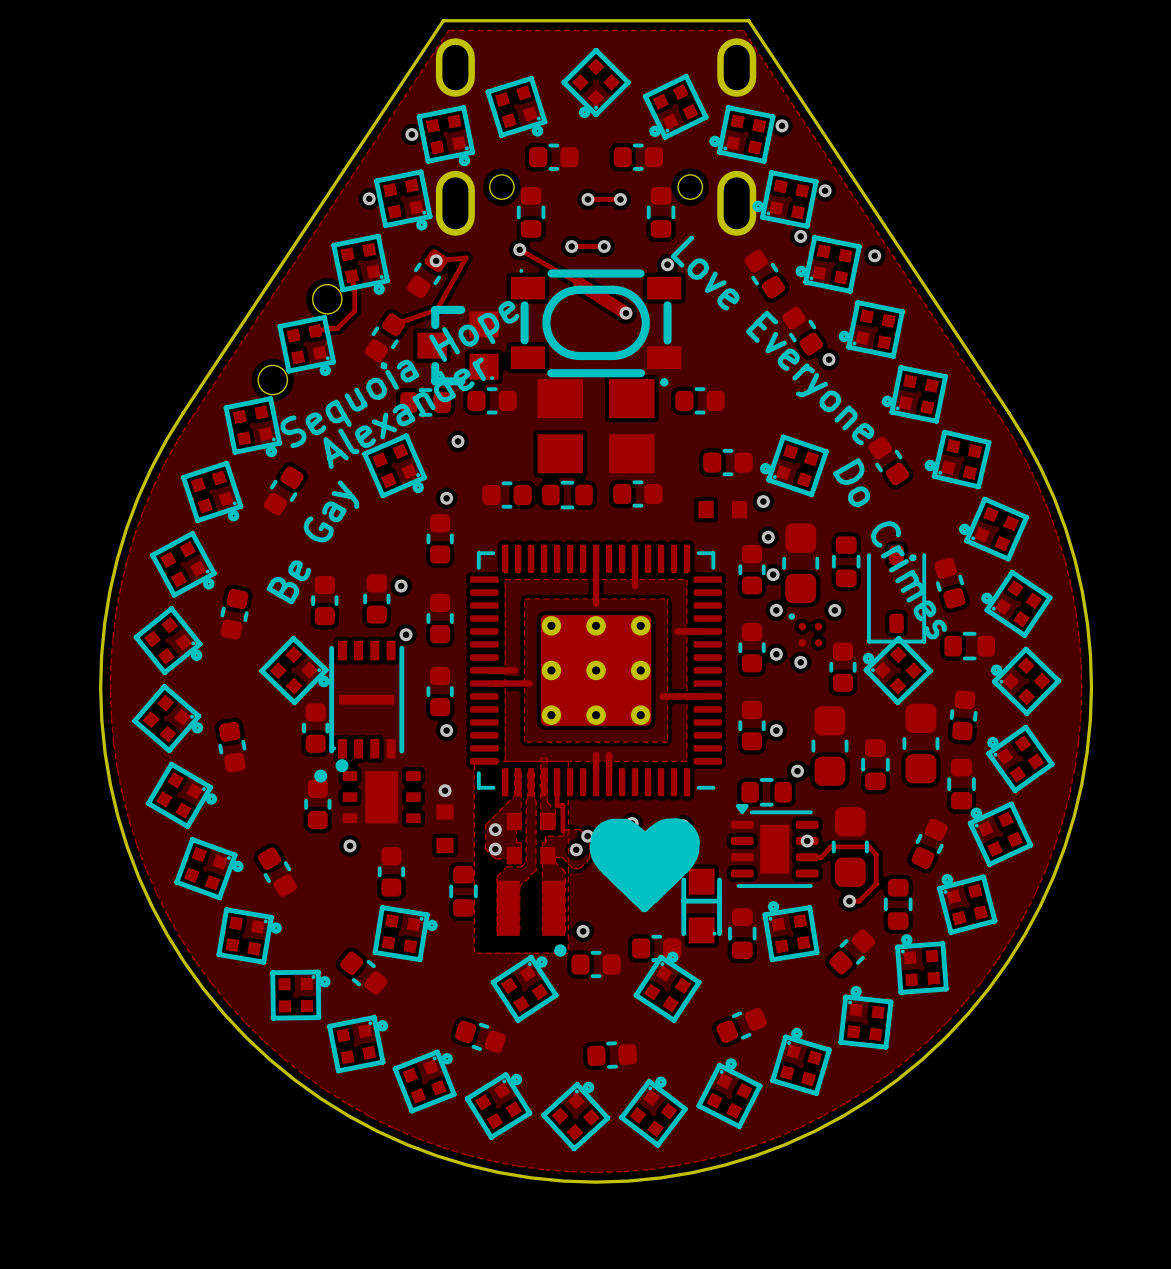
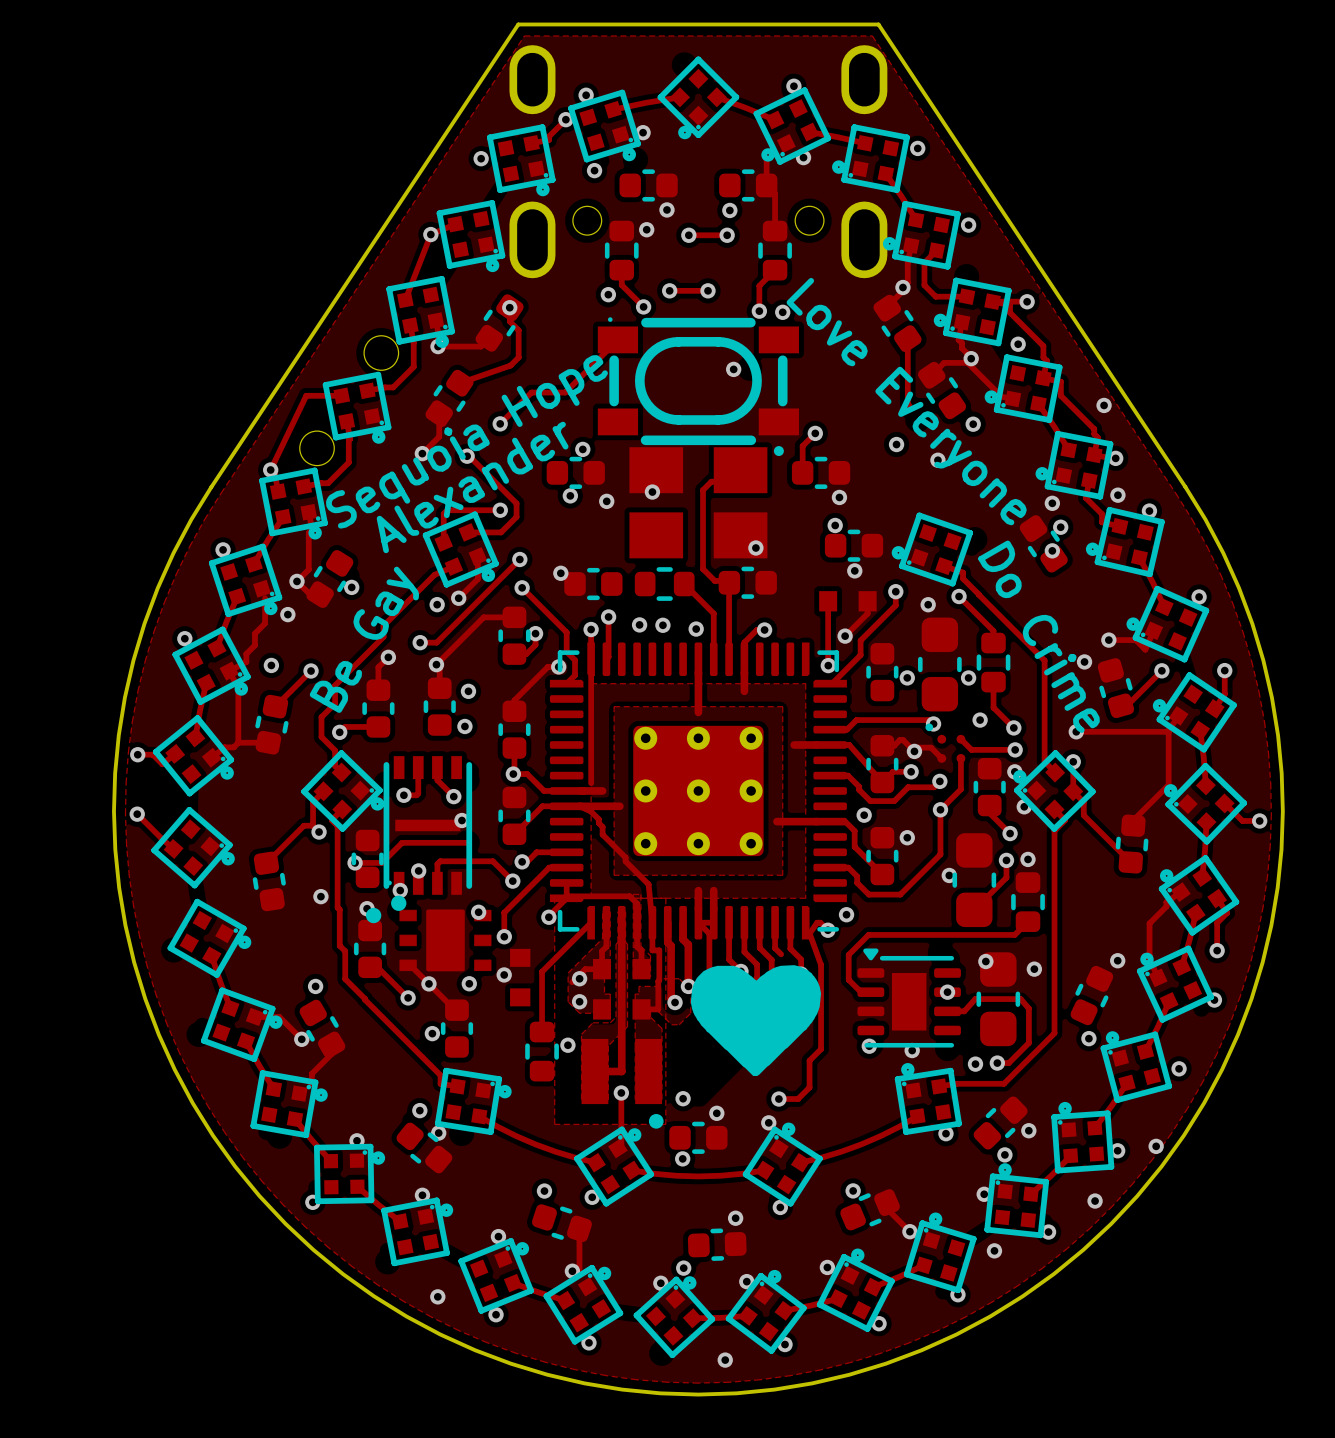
via: none -> (793, 86)
via: none -> (586, 95)
track: none -> (679, 97) (613, 109)
track: none -> (716, 97) (774, 120)
track: none -> (565, 119) (549, 136) (549, 139) (531, 143)
via: none -> (565, 119)
track: none -> (809, 132) (865, 143)
via: none -> (643, 132)
via: none -> (803, 157)
track: none -> (766, 160) (766, 185) (775, 193) (775, 231)
via: none -> (594, 170)
track: none -> (885, 173) (916, 220)
via: none -> (666, 209)
via: none -> (729, 210)
track: none -> (455, 224) (430, 234) (405, 300)
via: none -> (646, 229)
track: none -> (911, 245) (907, 263) (907, 282) (903, 287) (904, 289) (887, 308)
track: none -> (936, 250) (924, 262) (924, 285) (935, 296) (966, 296)
track: none -> (621, 270) (621, 285) (643, 306)
track: none -> (775, 270) (759, 285) (759, 311)
via position: (800, 236) -> (902, 287)
track: (519, 249) (625, 313) -> none
track: none -> (1027, 301) (992, 301) (1010, 305) (1010, 312) (1043, 346) (1043, 357) (1046, 360) (1043, 378) (1060, 381) (1060, 395) (1094, 429) (1094, 434) (1097, 437) (1094, 454) (1115, 458)
track: (436, 260) (466, 257) (436, 309) (393, 324) -> (509, 307) (509, 321) (518, 330) (518, 357) (510, 365) (459, 383)
via: none -> (643, 306)
via: none -> (759, 311)
track: none -> (435, 320) (439, 338) (438, 346) (481, 346) (489, 338)
track: none -> (962, 322) (958, 339) (962, 343) (962, 348) (967, 354) (967, 362)
track: none -> (907, 338) (907, 404) (909, 405)
track: none -> (617, 339) (565, 392) (531, 392) (500, 423)
via: none -> (1018, 344)
via: none -> (438, 346)
via: none -> (971, 358)
track: none -> (967, 362) (944, 362) (931, 375)
track: none -> (967, 362) (995, 390) (995, 395) (1012, 398)
track: none -> (341, 395) (306, 395) (270, 469) (274, 474) (278, 491)
track: none -> (1038, 403) (1068, 450)
via: none -> (1104, 405)
part: (458, 345) -> none
track: none -> (439, 413) (439, 436) (422, 453)
track: none -> (346, 421) (350, 438) (348, 462) (328, 483) (303, 486)
via: none -> (500, 423)
track: none -> (815, 433) (802, 446) (802, 472)
via: none -> (815, 433)
via: none -> (896, 444)
via: none -> (582, 449)
via: none -> (422, 453)
track: none -> (467, 456) (516, 503) (516, 516) (501, 532) (467, 532)
via: none -> (467, 456)
via: none -> (1115, 458)
via: none -> (937, 460)
via: none -> (270, 469)
track: none -> (750, 470) (740, 470) (729, 481) (711, 481) (703, 490) (703, 569) (714, 580) (727, 580) (729, 583) (729, 659)
part: (425, 402) -> none
track: none -> (1089, 480) (1085, 498) (1102, 514) (1102, 522) (1119, 526)
via: none -> (652, 492)
via: none -> (1117, 495)
via: none -> (570, 495)
via: none -> (839, 497)
via: none -> (606, 501)
via: none -> (1052, 503)
track: none -> (500, 510) (447, 510) (443, 513) (443, 542)
via: none -> (500, 510)
via: none -> (1149, 511)
track: none -> (308, 512) (312, 529) (308, 533) (308, 569) (296, 581) (310, 594) (320, 594)
track: none -> (283, 517) (253, 563)
via: (458, 441) -> none
via: none -> (835, 525)
via: none -> (1060, 527)
via: none -> (755, 547)
via: none -> (223, 549)
via: none -> (1052, 550)
track: none -> (477, 556) (477, 579) (456, 600)
track: none -> (1139, 557) (1164, 606)
track: none -> (519, 559) (436, 642) (420, 642)
via: none -> (519, 559)
track: none -> (944, 566) (963, 572) (963, 578) (1044, 660) (1044, 761) (1055, 772)
track: none -> (453, 566) (434, 574) (383, 625) (383, 636) (335, 685) (335, 703) (321, 717) (321, 736) (335, 750) (335, 765) (341, 772)
via: none -> (854, 570)
via: none -> (560, 573)
via: none -> (296, 581)
track: none -> (684, 584) (713, 613) (713, 659)
via: none -> (351, 587)
track: none -> (522, 587) (566, 632) (566, 651) (575, 660) (575, 675) (566, 683)
track: none -> (895, 591) (895, 605) (860, 640) (860, 655) (830, 683)
track: none -> (237, 596) (216, 648)
track: none -> (959, 596) (993, 630) (993, 643)
via: none -> (959, 596)
via: none -> (1199, 597)
track: none -> (265, 598) (265, 623) (254, 633) (254, 645) (246, 653) (246, 661)
via: none -> (458, 598)
track: none -> (828, 601) (828, 665)
track: none -> (867, 601) (867, 613) (845, 636)
via: none -> (437, 604)
via: none -> (928, 604)
via: none -> (287, 614)
track: none -> (514, 617) (483, 617) (436, 664) (439, 667) (439, 688)
track: none -> (608, 616) (608, 657) (606, 659)
via: none -> (608, 616)
via: none -> (639, 624)
via: none -> (662, 625)
track: none -> (591, 629) (591, 783)
via: none -> (591, 629)
via: none -> (696, 629)
track: none -> (764, 629) (756, 629) (744, 642) (744, 659)
via: none -> (764, 629)
track: none -> (1153, 630) (1145, 649) (1135, 640) (1108, 640)
track: none -> (535, 633) (535, 644) (526, 654) (514, 654)
via: none -> (535, 633)
via: (768, 537) -> none
via: none -> (845, 636)
via: none -> (184, 638)
via: none -> (1108, 640)
via: none -> (420, 642)
text: Do Crimes (890, 548) -> Do Crime (1039, 636)
track: none -> (388, 657) (378, 667) (378, 690)
via: none -> (388, 657)
track: none -> (246, 661) (229, 671) (238, 688) (238, 742)
via: none -> (1084, 661)
via: none -> (436, 664)
via: none -> (271, 665)
via: none -> (828, 665)
track: none -> (558, 666) (547, 666) (514, 700) (514, 711)
via: none -> (558, 666)
track: none -> (311, 671) (275, 706)
via: none -> (311, 671)
track: none -> (1161, 670) (1126, 705) (1121, 705)
via: none -> (1161, 670)
track: none -> (1224, 670) (1224, 694) (1214, 708)
via: none -> (1224, 670)
via: none -> (968, 677)
track: none -> (993, 682) (993, 707) (1013, 727)
track: none -> (206, 683) (195, 737)
part: (896, 594) -> none
track: none -> (1178, 715) (1168, 730) (1168, 785) (1133, 820) (1133, 825)
via: (776, 610) -> none
track: none -> (933, 723) (929, 720) (856, 720) (846, 729) (830, 729)
via: none -> (933, 723)
via: none -> (464, 726)
track: none -> (378, 726) (345, 726) (339, 732)
via: none -> (1013, 727)
track: none -> (1200, 730) (1205, 785)
via: none -> (339, 732)
track: none -> (1076, 731) (1168, 731)
via: none -> (1076, 731)
track: none -> (960, 739) (971, 749) (1015, 749)
track: none -> (238, 742) (233, 747) (224, 747) (211, 757)
track: none -> (238, 742) (268, 742)
track: none -> (830, 744) (849, 744) (882, 782) (893, 771) (911, 771)
track: none -> (882, 745) (894, 745) (899, 740) (903, 740) (914, 751) (918, 747) (931, 747) (941, 758)
via: (406, 634) -> none
track: none -> (514, 748) (513, 774) (527, 774) (544, 790) (579, 790)
via: none -> (1015, 749)
via: none -> (914, 751)
via: none -> (137, 754)
track: none -> (175, 753) (162, 764) (152, 754) (137, 754)
track: none -> (960, 758) (960, 789) (940, 809) (940, 854) (900, 894) (868, 894) (857, 882) (857, 876) (848, 867) (830, 867)
track: none -> (1073, 761) (1073, 791) (1083, 802) (1083, 815) (1130, 862)
via: none -> (1073, 761)
part: (969, 646) -> none
track: none -> (418, 767) (418, 793) (403, 795)
track: none -> (437, 767) (437, 780) (453, 796)
via: none -> (1014, 771)
via: none -> (513, 774)
track: none -> (830, 775) (848, 775) (870, 801) (894, 801) (908, 787) (933, 787) (939, 781)
track: none -> (323, 791) (313, 802) (313, 825)
via: none -> (403, 795)
via: none -> (453, 796)
track: none -> (1224, 803) (1242, 820) (1259, 820)
track: none -> (989, 805) (989, 813) (1010, 833)
track: none -> (566, 806) (542, 806) (514, 834)
track: none -> (579, 806) (591, 811) (598, 819) (598, 823) (602, 826) (602, 834) (648, 884) (652, 936)
via: none -> (1024, 806)
track: none -> (342, 809) (331, 820) (337, 826) (337, 907) (339, 909) (339, 945) (345, 951) (345, 979) (440, 1075) (440, 1083) (457, 1086)
via: none -> (940, 809)
track: none -> (1054, 809) (1065, 820) (1054, 830) (1054, 1033) (1003, 1083) (956, 1083) (939, 1086)
track: none -> (137, 814) (173, 848)
via: none -> (137, 814)
via: none -> (864, 815)
via: none -> (461, 820)
via: none -> (1259, 820)
track: none -> (845, 821) (854, 830) (854, 846) (882, 874)
track: none -> (1206, 822) (1202, 877)
track: none -> (313, 825) (303, 825) (266, 863)
via: none -> (319, 832)
via: none -> (1010, 833)
via: none -> (907, 837)
track: none -> (467, 842) (402, 842) (382, 862) (355, 862)
track: none -> (566, 852) (536, 852) (525, 863)
via: none -> (1028, 859)
track: none -> (1006, 860) (1006, 877) (974, 909)
via: none -> (1006, 860)
via: (776, 730) -> none
via: none -> (355, 862)
track: none -> (566, 867) (549, 867) (504, 912) (504, 936)
via: none -> (418, 870)
via: none -> (949, 875)
part: (920, 743) -> none
track: none -> (512, 881) (492, 861) (440, 861) (437, 864) (437, 883)
via: none -> (512, 881)
track: none -> (566, 882) (566, 898) (548, 917)
via: none -> (400, 890)
track: none -> (1180, 892) (1166, 902) (1166, 906) (1149, 923) (1149, 959) (1158, 977)
track: none -> (566, 896) (629, 896) (637, 903) (637, 946) (641, 951) (641, 969)
via: none -> (320, 896)
track: none -> (1217, 898) (1227, 912) (1217, 922) (1217, 950)
via: none -> (367, 908)
via: (797, 771) -> none
via: none -> (478, 912)
track: none -> (1195, 913) (1181, 966)
via: none -> (846, 914)
via: none -> (548, 917)
track: none -> (1028, 921) (1014, 934) (868, 934) (848, 954) (848, 979) (860, 992) (870, 992)
track: none -> (591, 922) (542, 971) (542, 1032)
track: none -> (606, 922) (606, 946) (602, 951) (602, 969) (585, 969) (572, 982)
track: none -> (621, 922) (621, 1071) (594, 1071)
track: none -> (667, 922) (667, 942) (671, 945) (671, 998) (675, 1002)
track: none -> (683, 922) (683, 939) (688, 944) (688, 986)
track: none -> (713, 922) (698, 922) (709, 933) (709, 1008)
track: none -> (729, 922) (729, 959) (740, 971)
track: none -> (744, 922) (744, 951) (757, 964) (757, 978) (744, 990) (744, 1000) (747, 1004)
track: none -> (759, 922) (759, 947) (771, 959) (771, 989) (767, 993)
track: none -> (775, 922) (775, 948) (781, 954)
track: none -> (790, 922) (790, 948) (801, 959) (801, 974)
part: (961, 784) -> none
track: none -> (827, 930) (820, 922) (817, 922) (809, 933) (821, 964) (821, 1049) (809, 1060) (809, 1087) (798, 1099) (778, 1099)
via: none -> (827, 930)
via: (445, 790) -> none
part: (766, 792) -> none
via: none -> (504, 936)
via: none -> (1217, 950)
track: none -> (211, 956) (230, 1008)
via: none -> (1117, 960)
via: none -> (985, 961)
track: none -> (408, 965) (410, 965) (456, 1010)
track: none -> (370, 967) (377, 967) (408, 997)
via: none -> (1034, 969)
via: none -> (504, 974)
track: none -> (659, 980) (658, 1009) (641, 1009)
via: none -> (469, 983)
via: none -> (428, 983)
via: none -> (315, 986)
via: none -> (1214, 1000)
track: none -> (1169, 1001) (1145, 1051)
track: none -> (254, 1016) (279, 1016) (301, 1039)
via: none -> (432, 1033)
via: none -> (1088, 1038)
via: none -> (301, 1039)
track: none -> (245, 1041) (273, 1089)
track: none -> (331, 1044) (331, 1054) (311, 1073) (311, 1083) (310, 1082)
via: none -> (567, 1045)
via: none -> (869, 1046)
via: none -> (912, 1050)
via: none -> (975, 1064)
part: (898, 904) -> none
part: (701, 906) -> none
via: none -> (1179, 1068)
track: none -> (1127, 1083) (1094, 1128)
track: none -> (621, 1092) (621, 1145) (617, 1148)
via: none -> (621, 1092)
via: none -> (778, 1099)
part: (742, 933) -> none
via: none -> (419, 1110)
via: none -> (716, 1113)
track: none -> (479, 1116) (535, 1144) (596, 1162)
track: none -> (917, 1116) (861, 1144) (800, 1162)
track: none -> (294, 1119) (330, 1161)
part: (656, 948) -> none
via: none -> (768, 1122)
via: none -> (1028, 1130)
via: none -> (438, 1133)
via: none -> (945, 1133)
via: none -> (356, 1140)
via: none -> (1156, 1146)
via: none -> (1117, 1150)
via: none -> (1004, 1154)
track: none -> (1070, 1155) (1031, 1194)
via: none -> (682, 1158)
track: none -> (632, 1170) (698, 1176) (764, 1170)
track: none -> (357, 1186) (400, 1221)
via: none -> (544, 1191)
via: none -> (853, 1190)
via: none -> (984, 1194)
via: none -> (422, 1195)
via: none -> (592, 1197)
via: none -> (1095, 1201)
via: none -> (312, 1202)
via: none -> (780, 1207)
track: none -> (887, 1208) (912, 1234)
via: none -> (735, 1218)
track: none -> (579, 1228) (579, 1273) (577, 1271) (572, 1271)
via: none -> (909, 1231)
via: none -> (1048, 1232)
via: none -> (498, 1236)
via: none -> (994, 1250)
track: none -> (923, 1265) (873, 1287)
via: none -> (683, 1268)
via: none -> (827, 1267)
via: none -> (572, 1271)
via: none -> (746, 1281)
track: none -> (513, 1283) (565, 1300)
via: none -> (660, 1283)
via: none -> (957, 1294)
via: none -> (437, 1296)
track: none -> (838, 1298) (784, 1310)
via: none -> (496, 1314)
track: none -> (747, 1315) (692, 1318)
via: none -> (879, 1323)
via: none -> (588, 1342)
via: none -> (785, 1344)
via: none -> (725, 1360)

